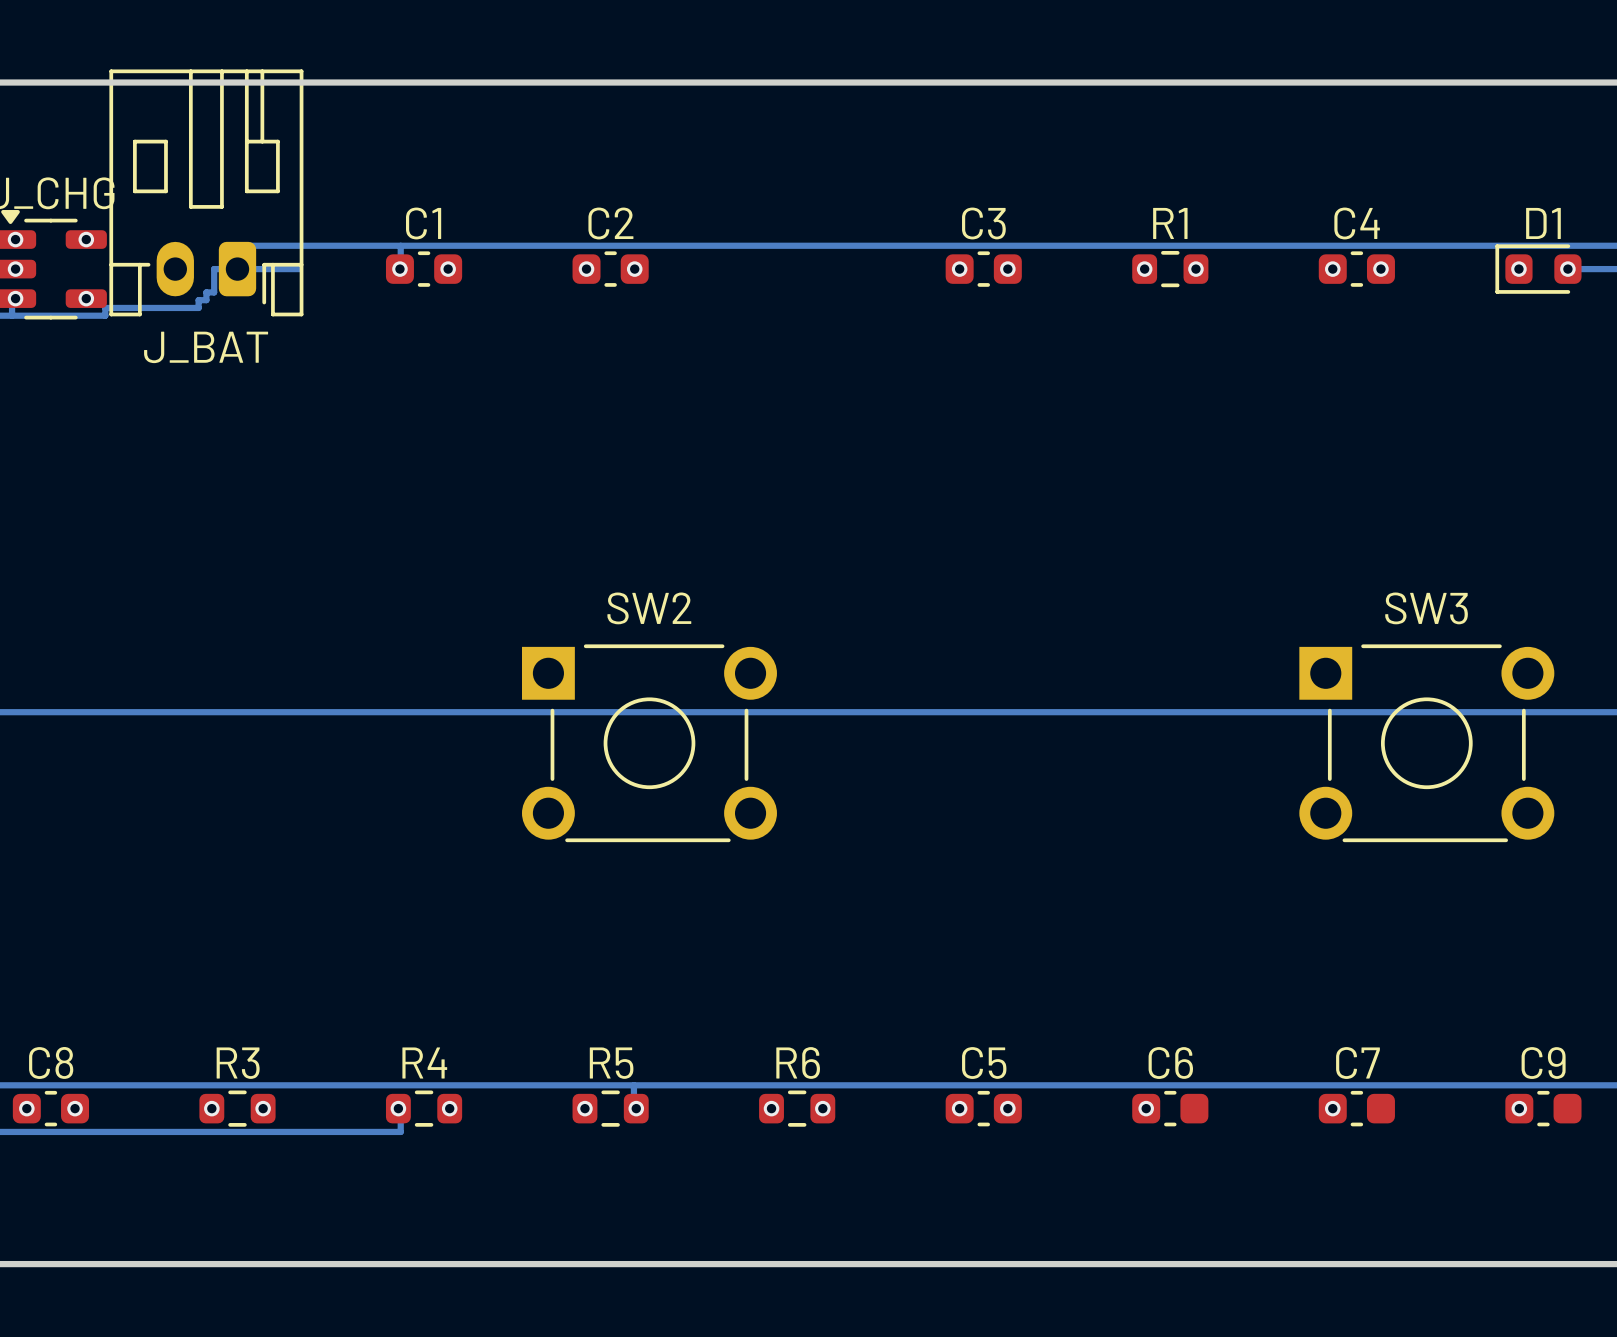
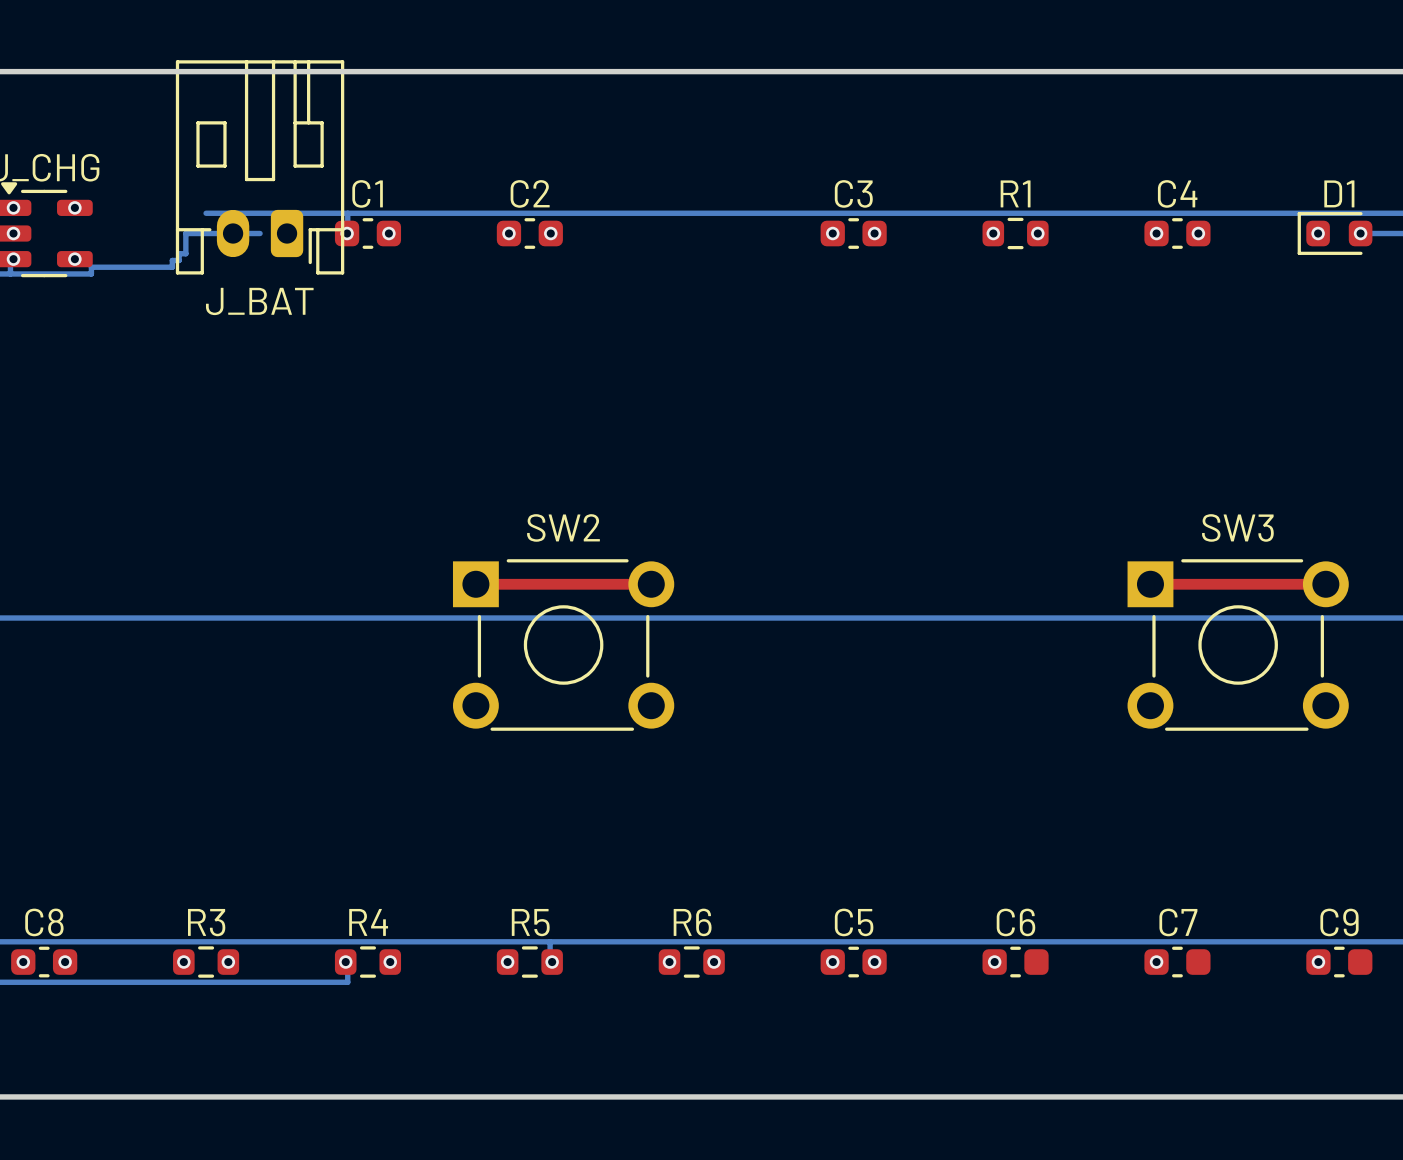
J_BAT position: (206, 192) -> (260, 167)
top track: none -> (475, 584) (651, 584)
top track: none -> (1150, 584) (1325, 584)

